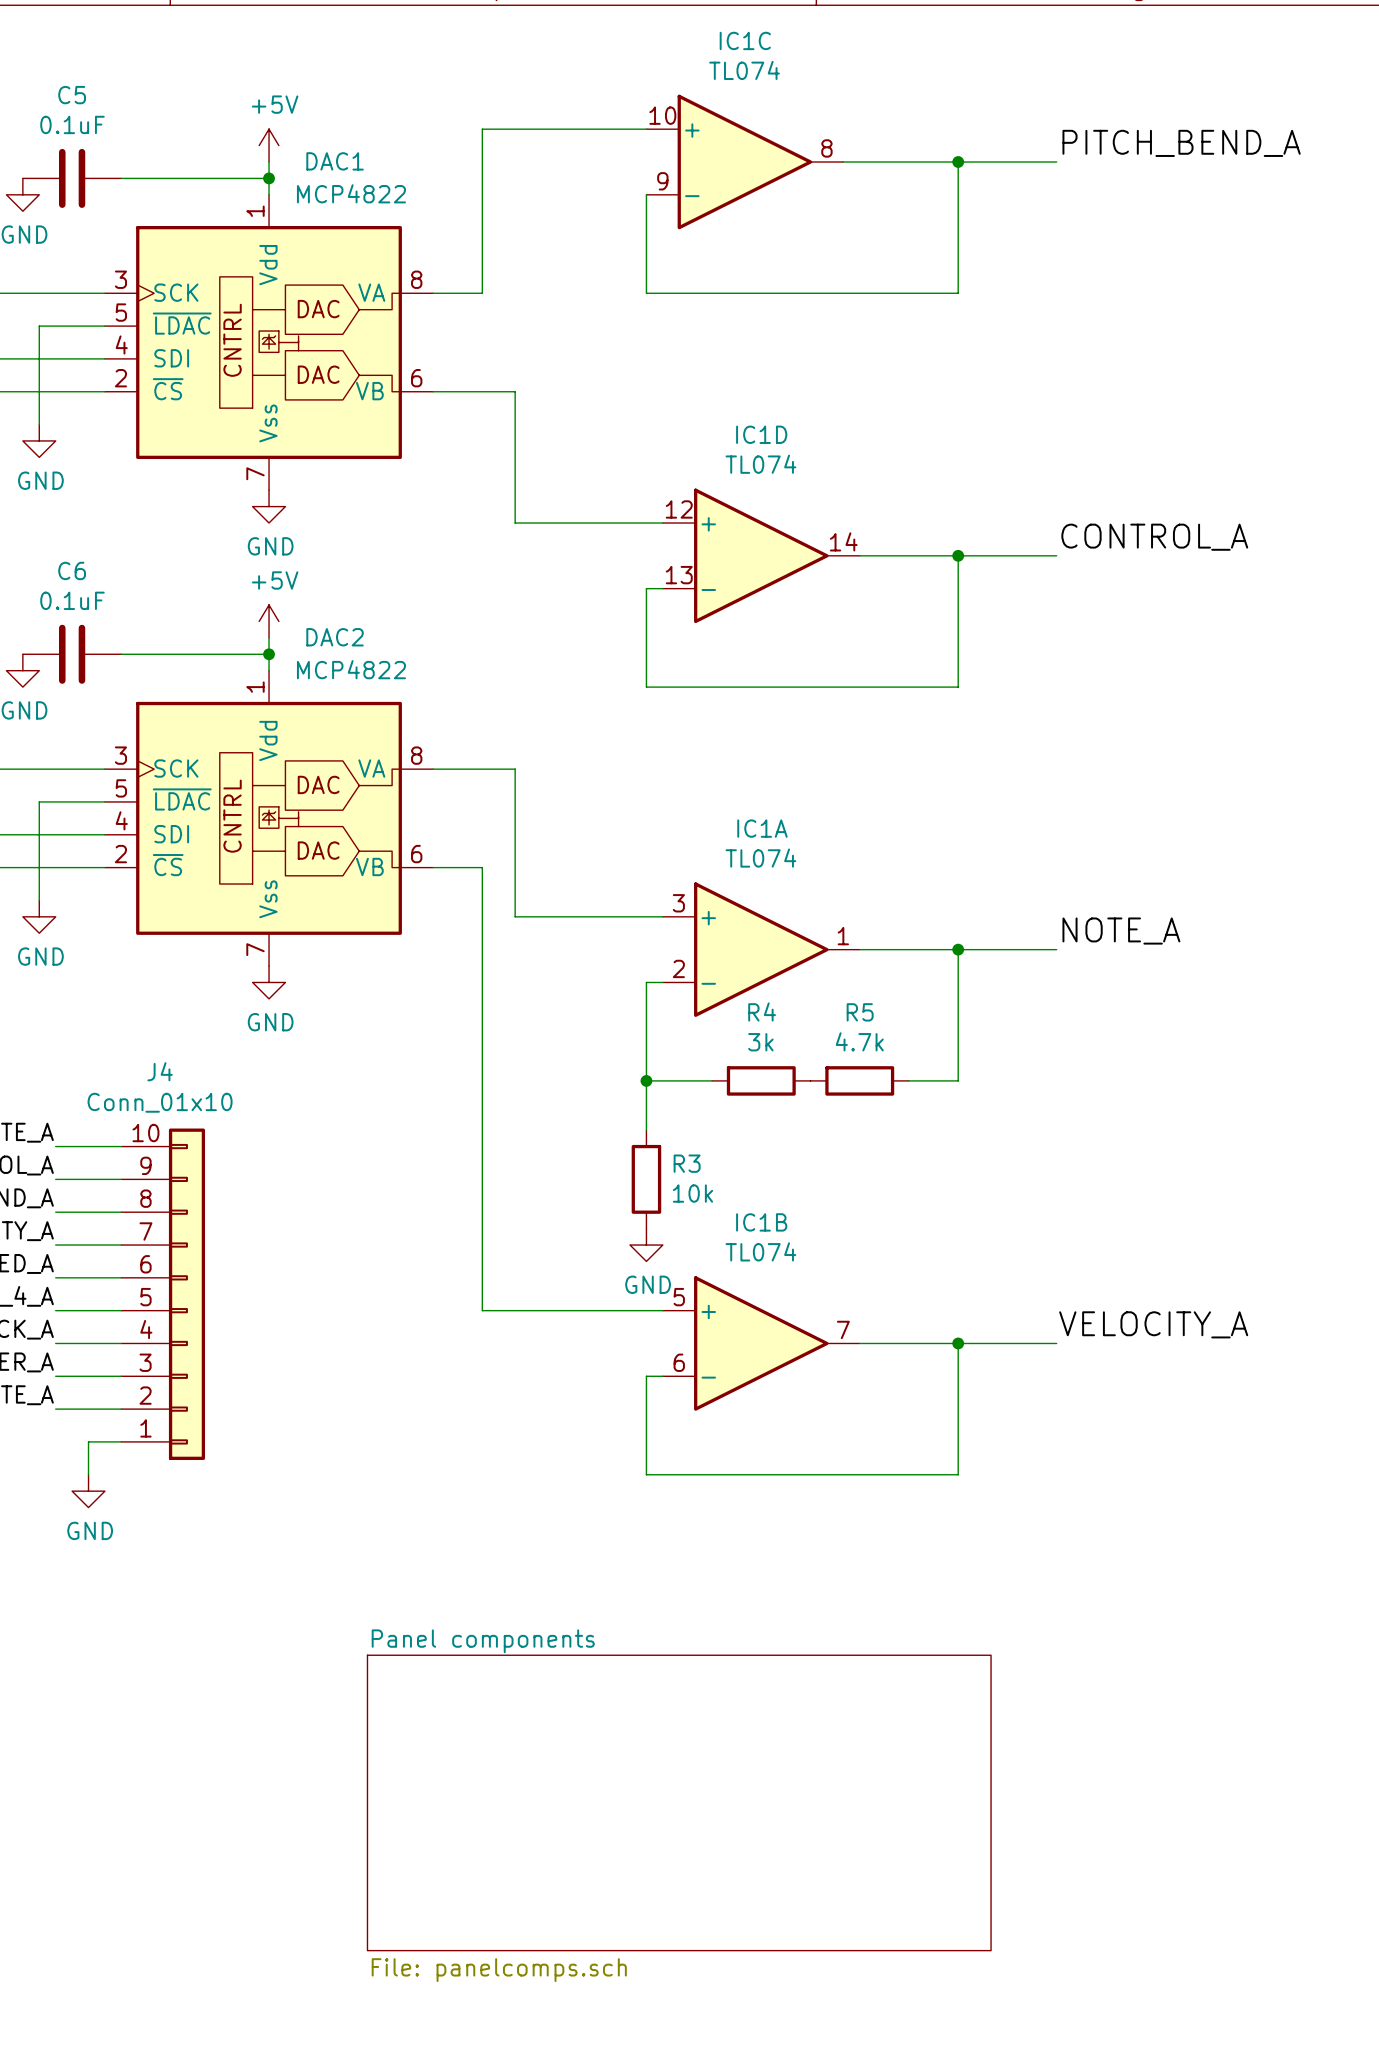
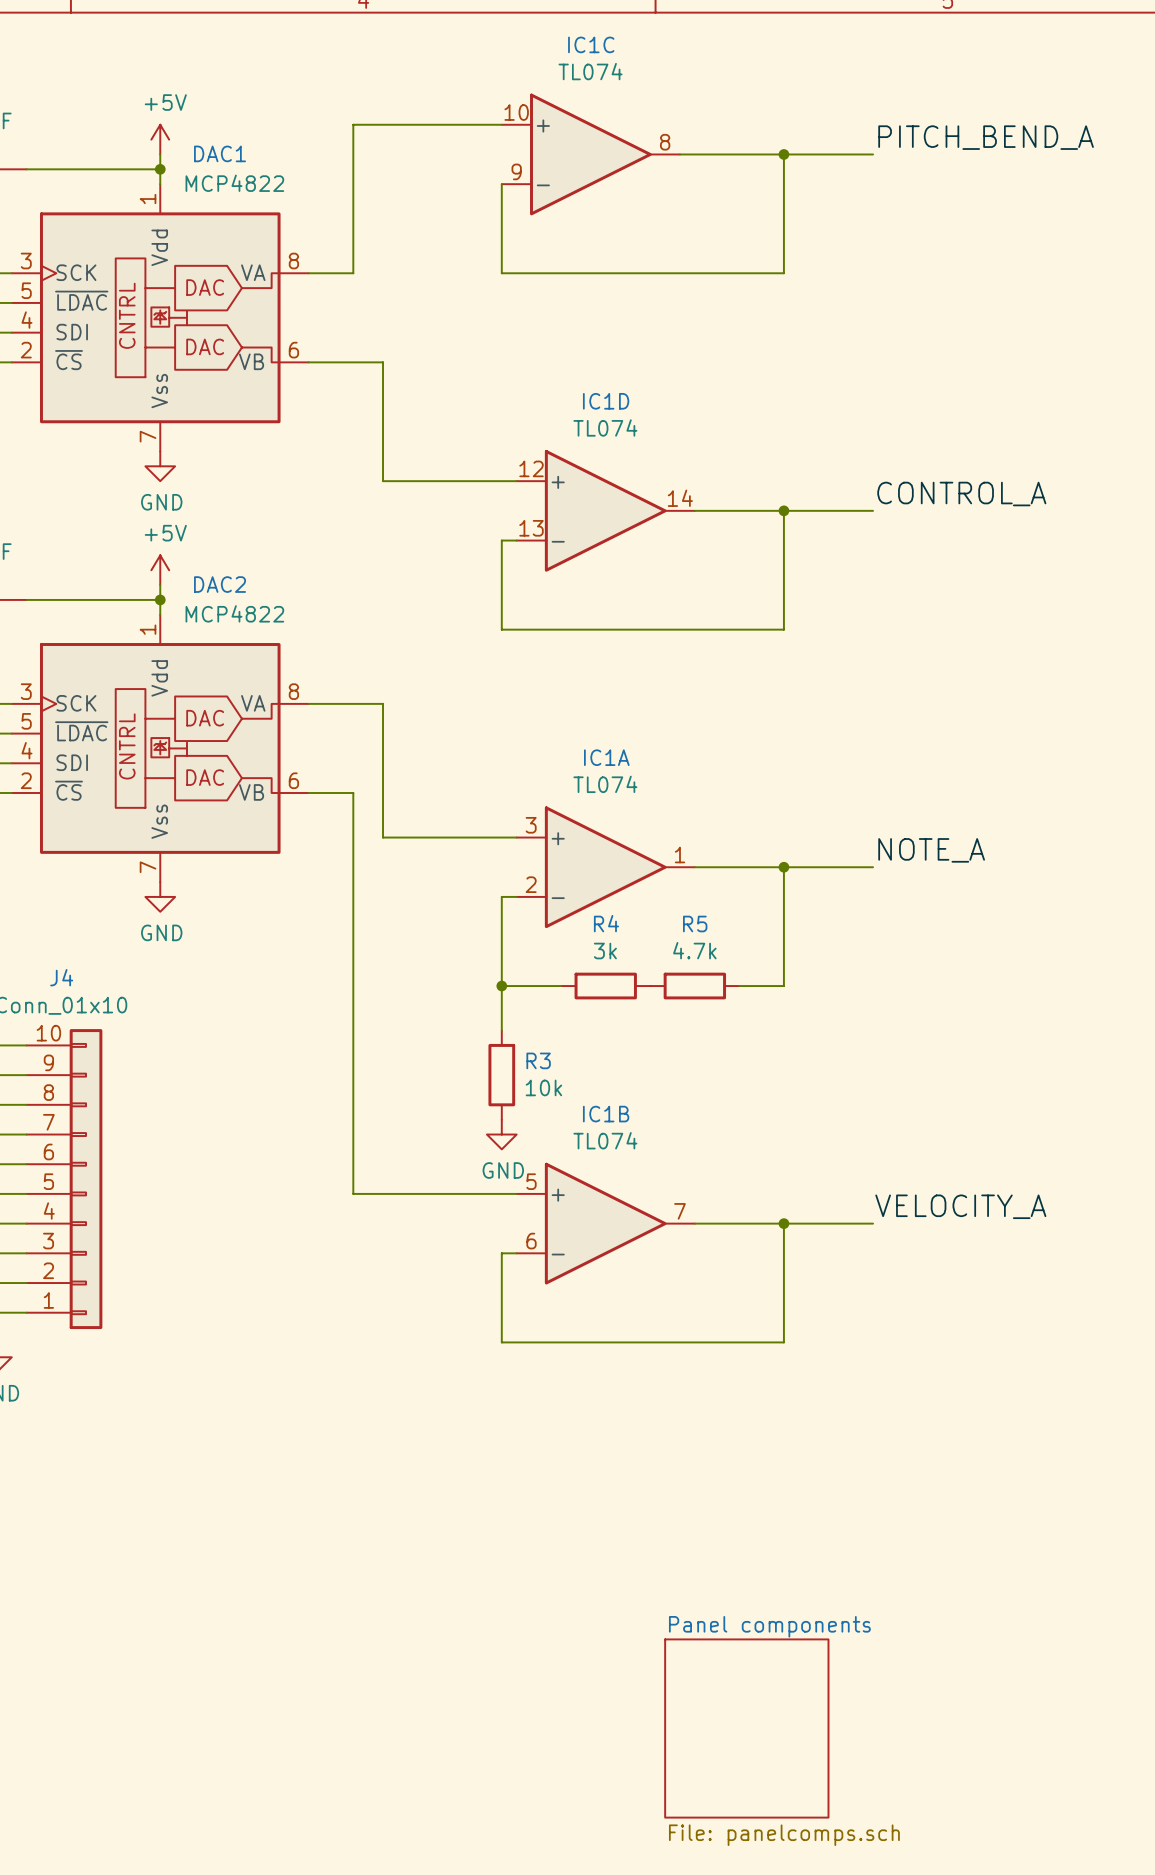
sheet Panel components: File: panelcomps.sch (679, 1802) -> none
sheet Panel components: none -> File: panelcomps.sch (746, 1728)

